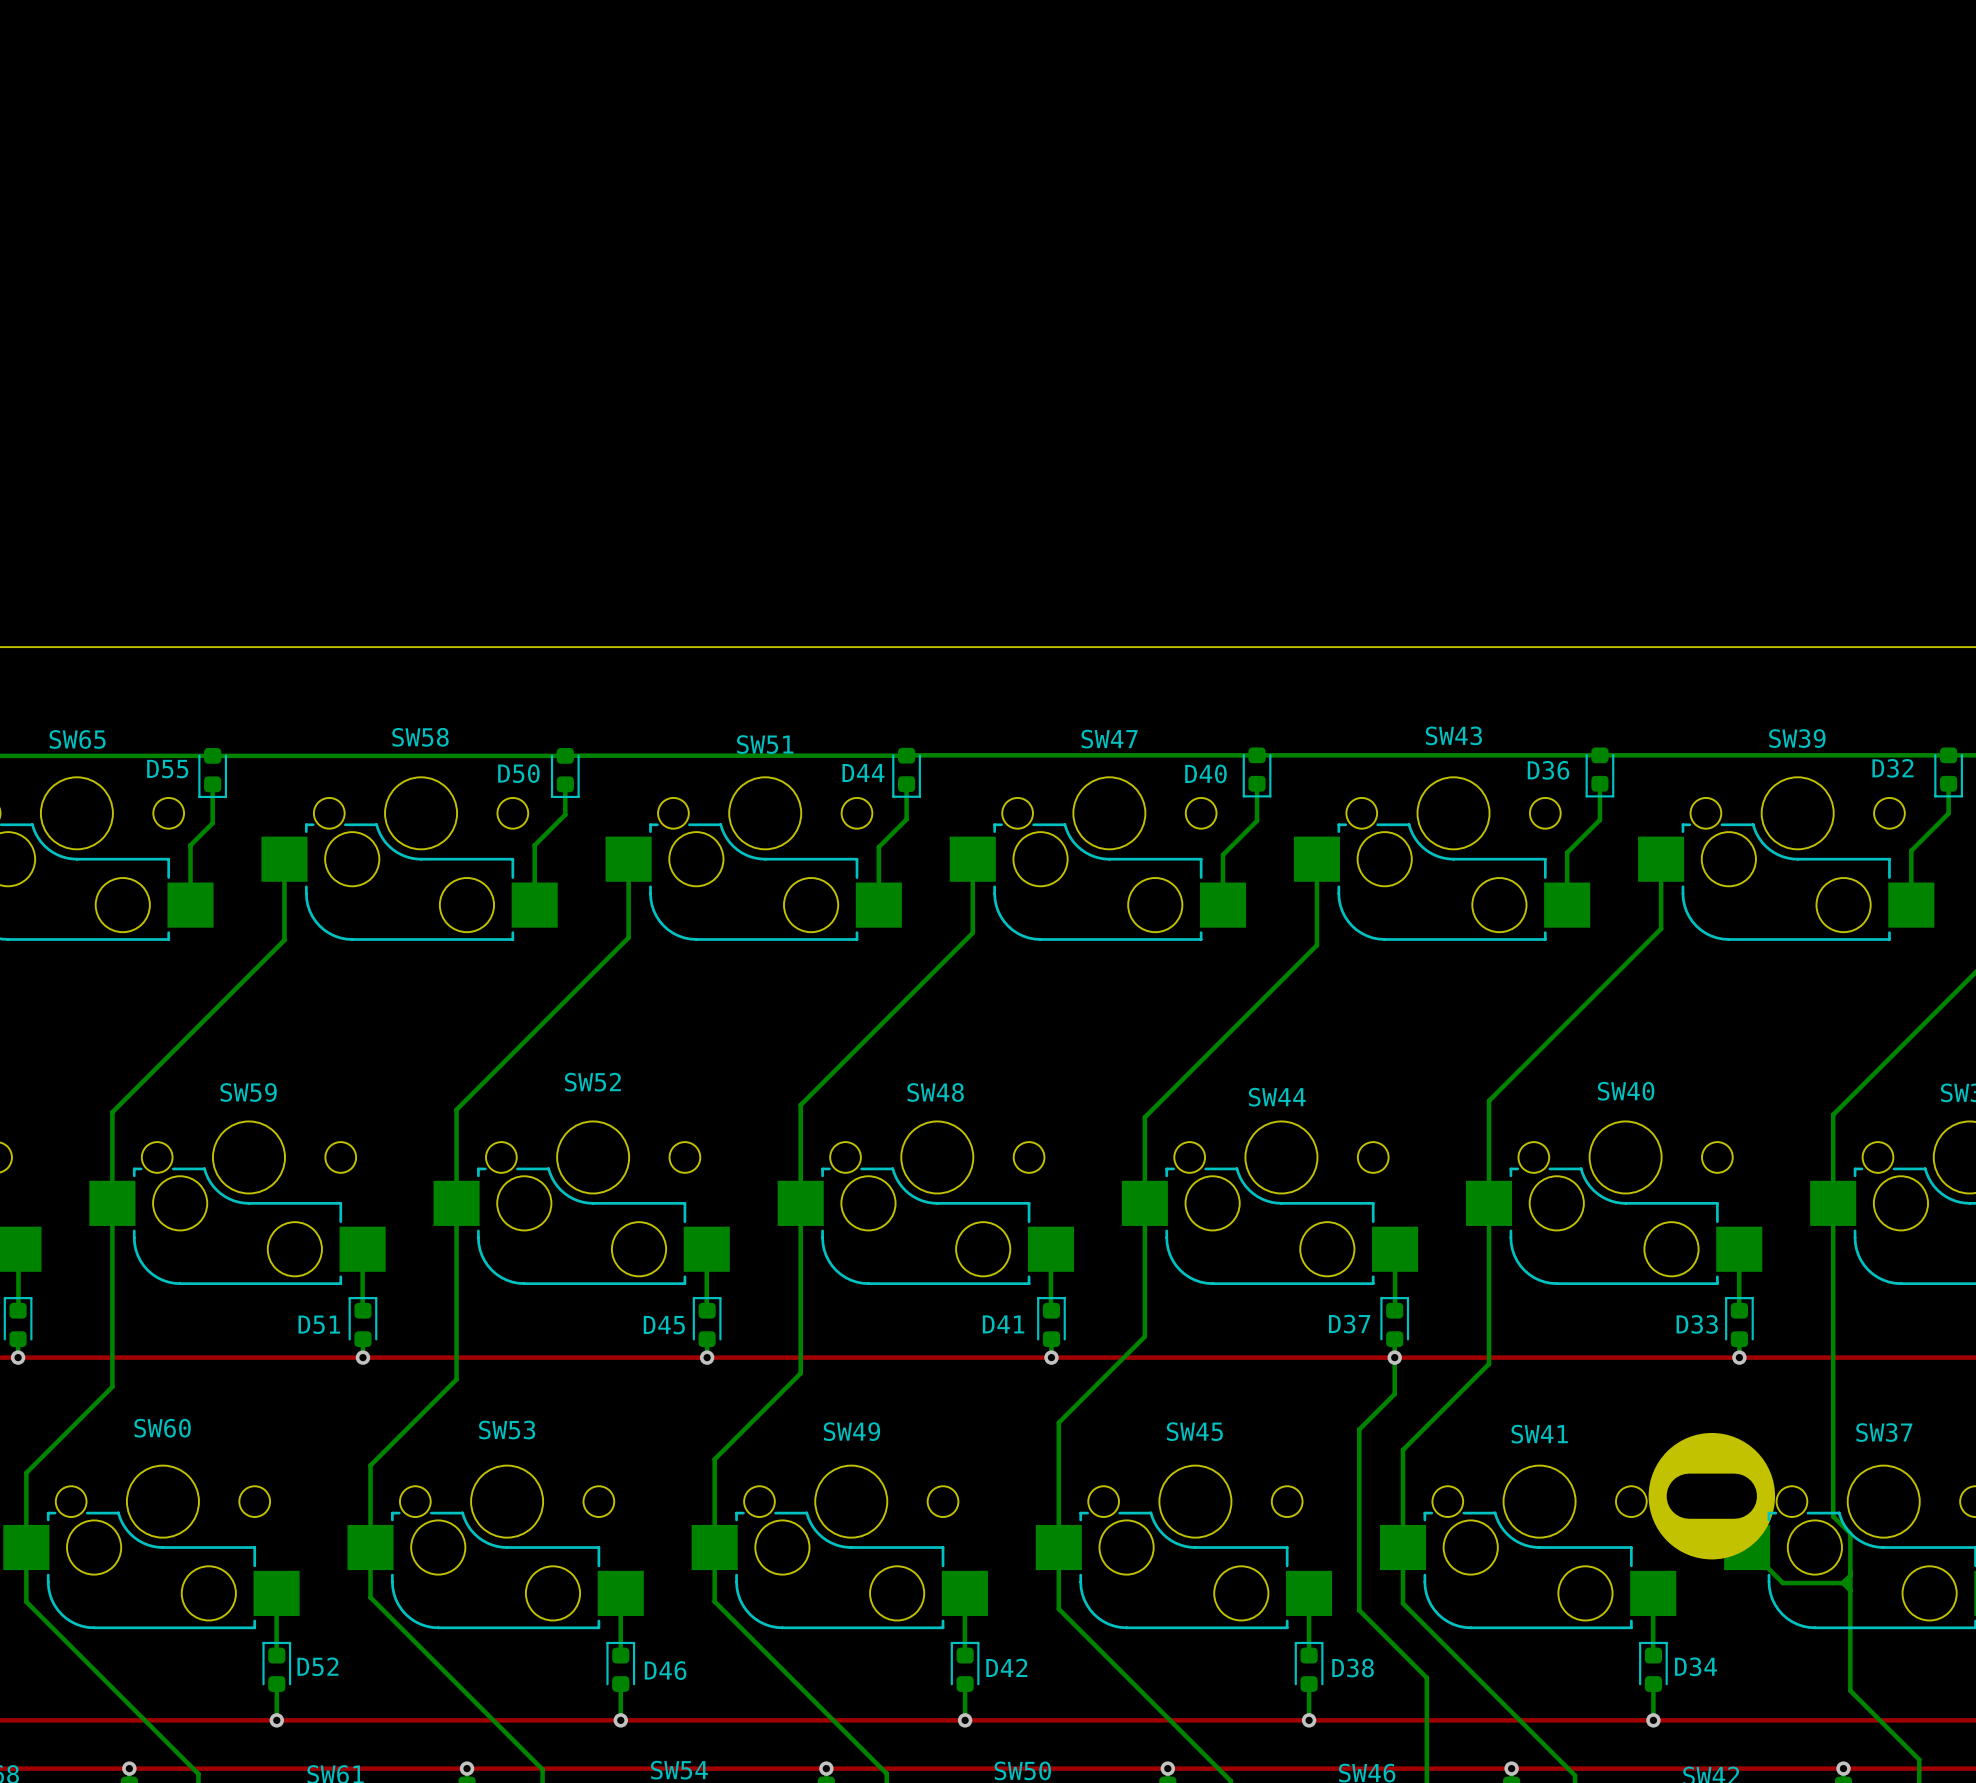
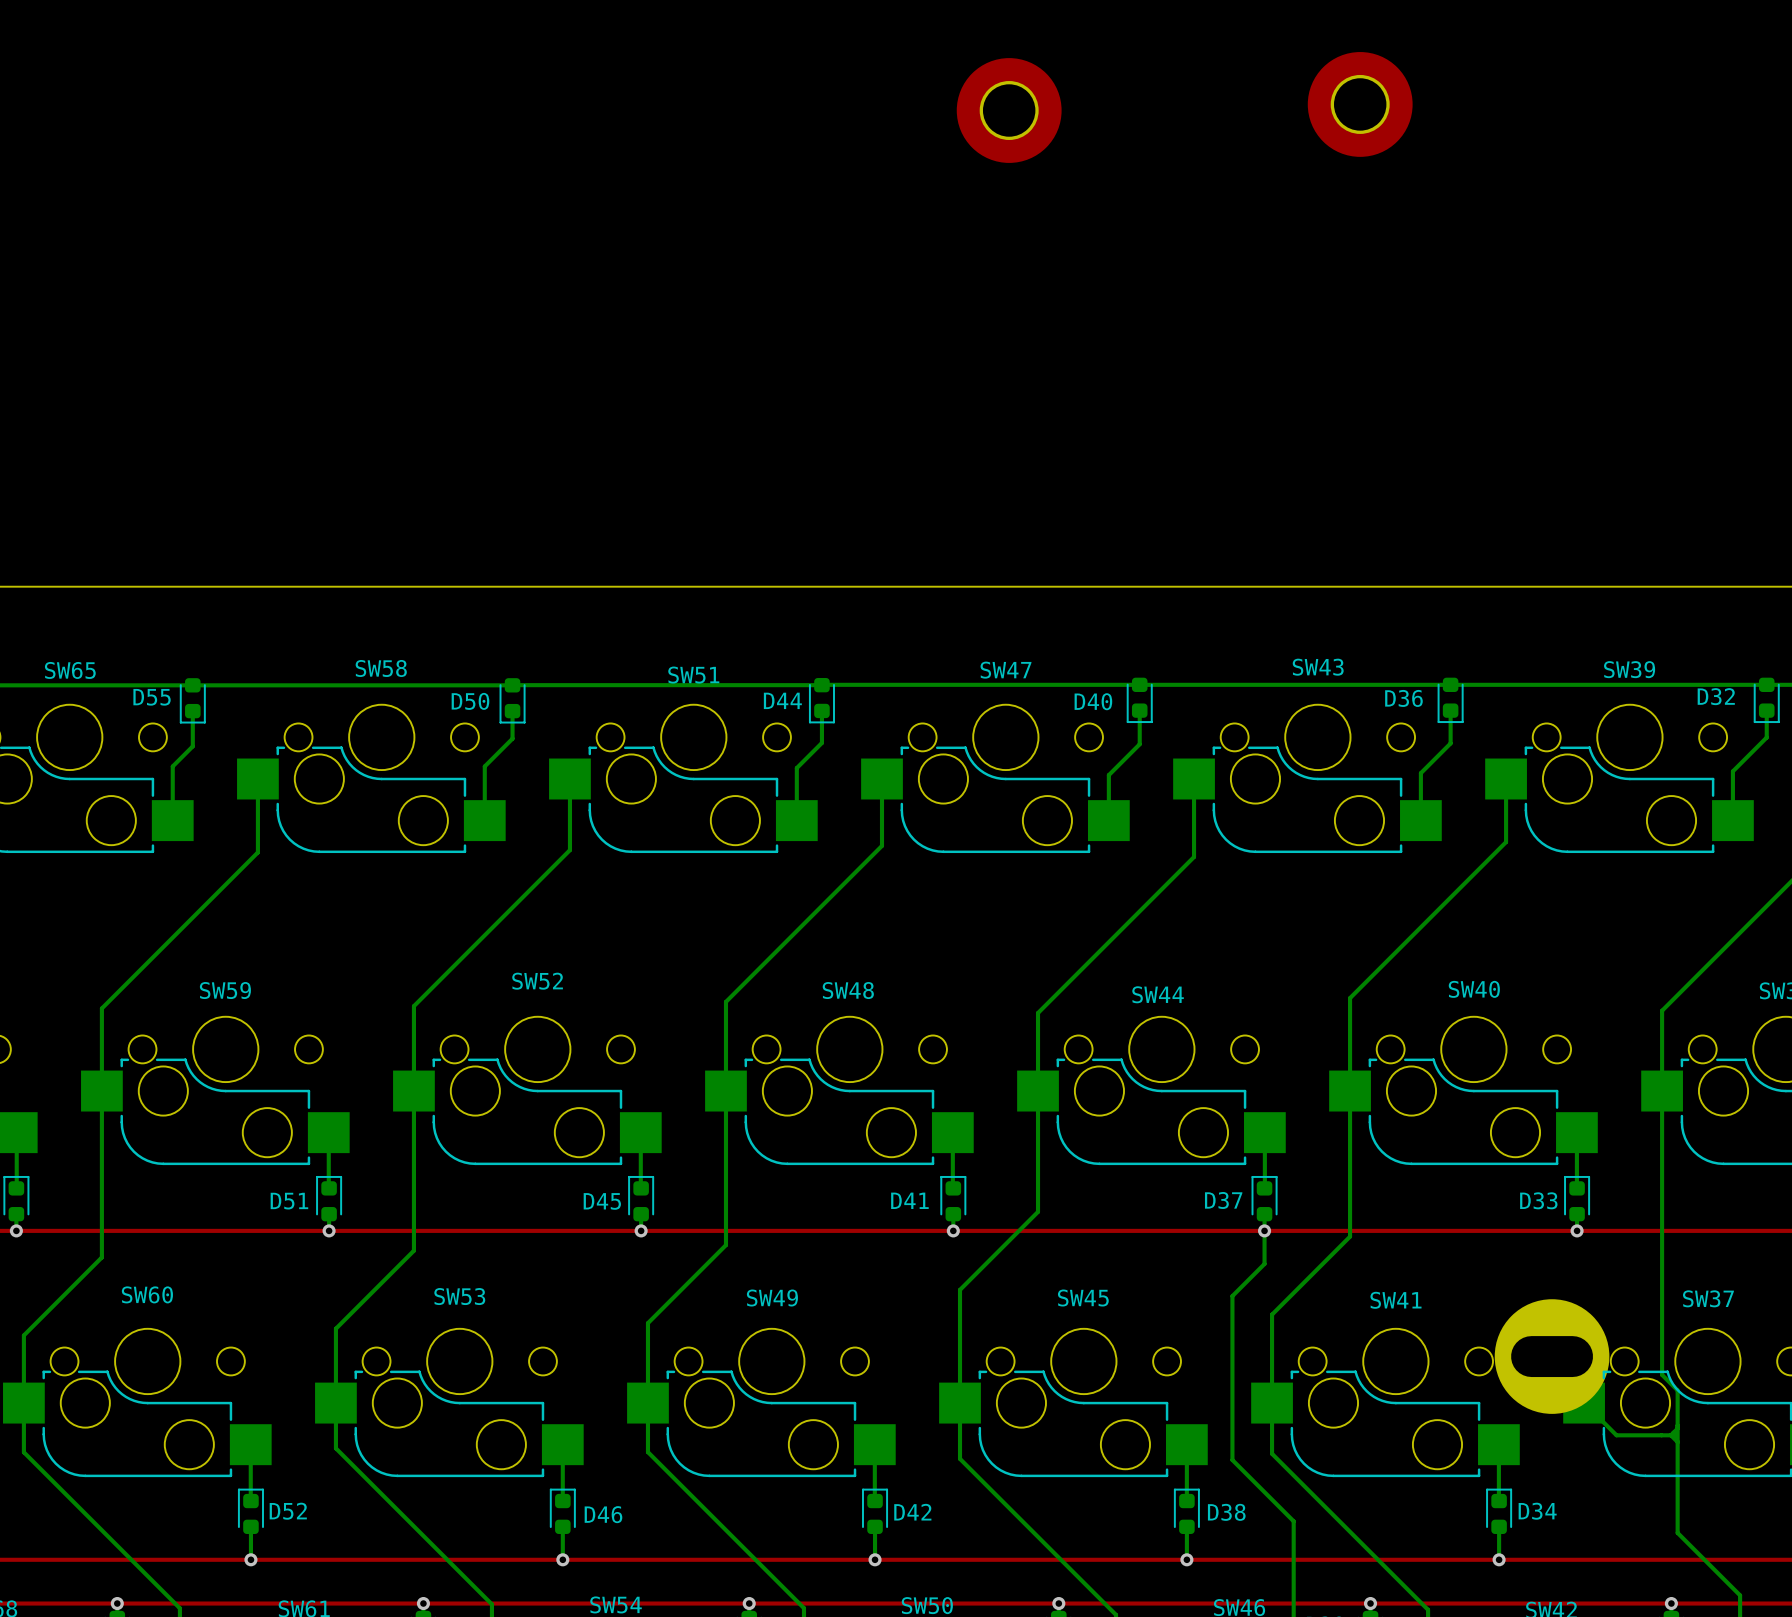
part: none -> (1360, 104)
part: none -> (1009, 110)

